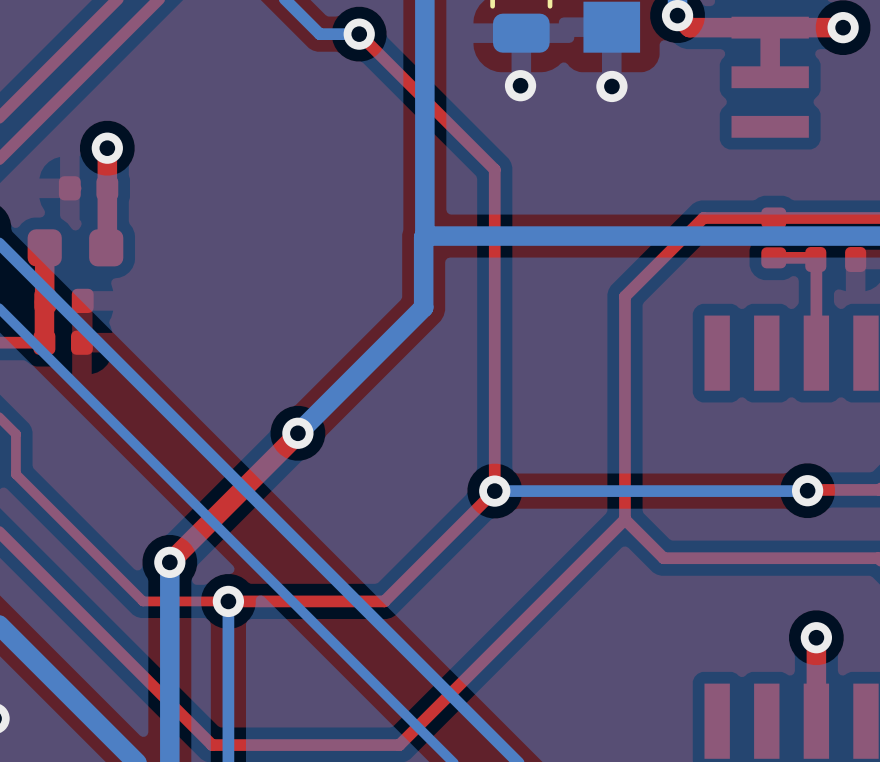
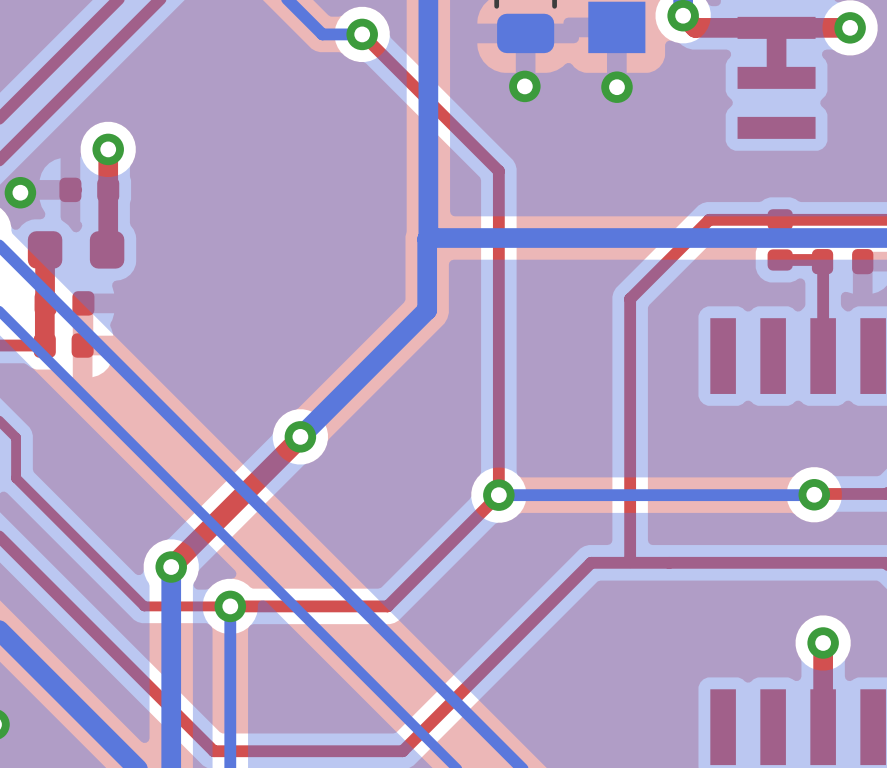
via: none -> (20, 192)
top track: none -> (630, 523) (630, 562)
top track: (663, 558) (624, 519) (586, 558) -> (669, 562) (591, 562)

